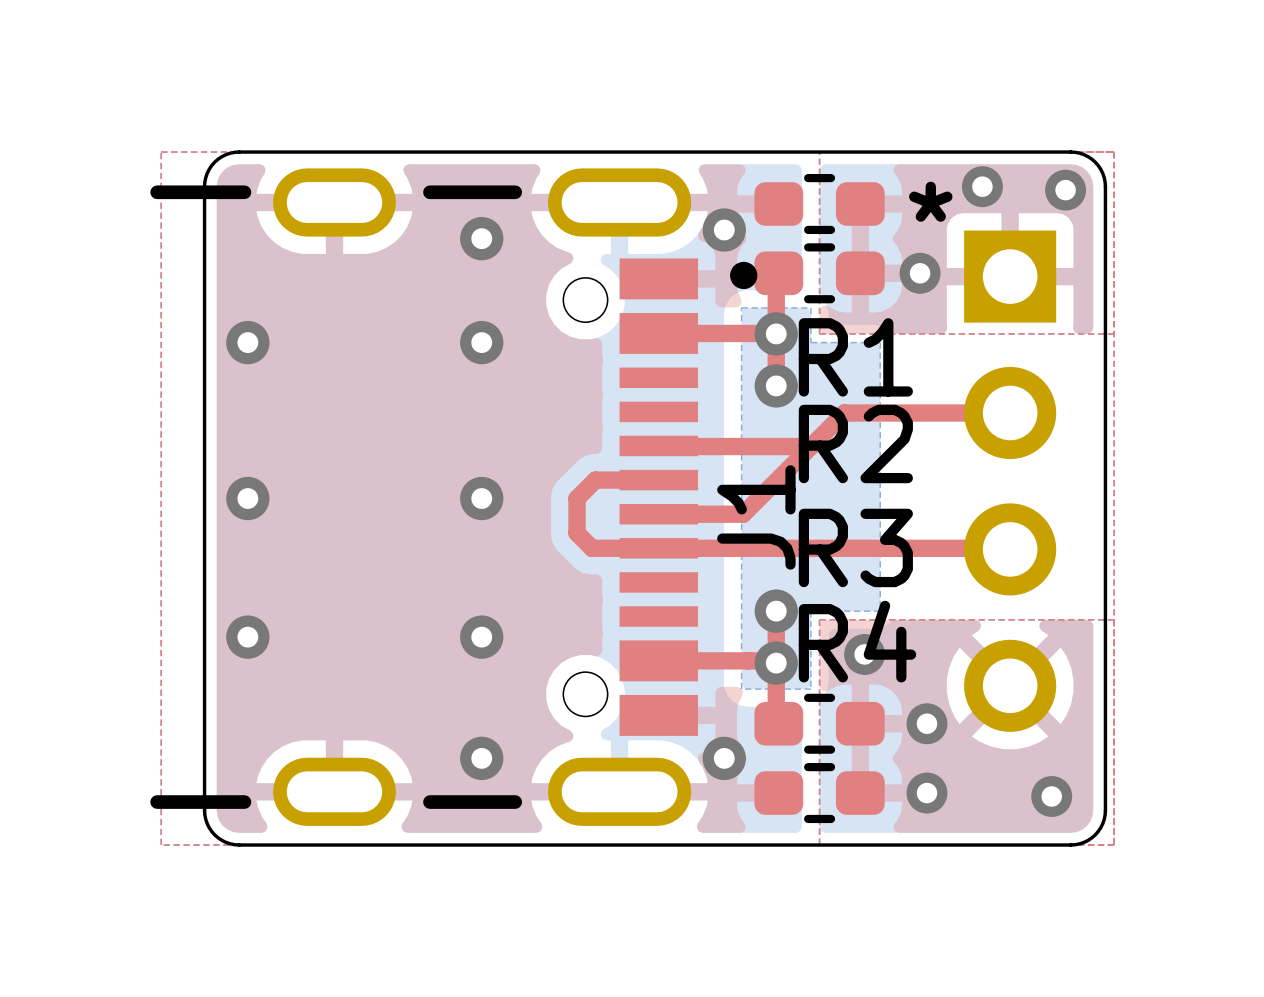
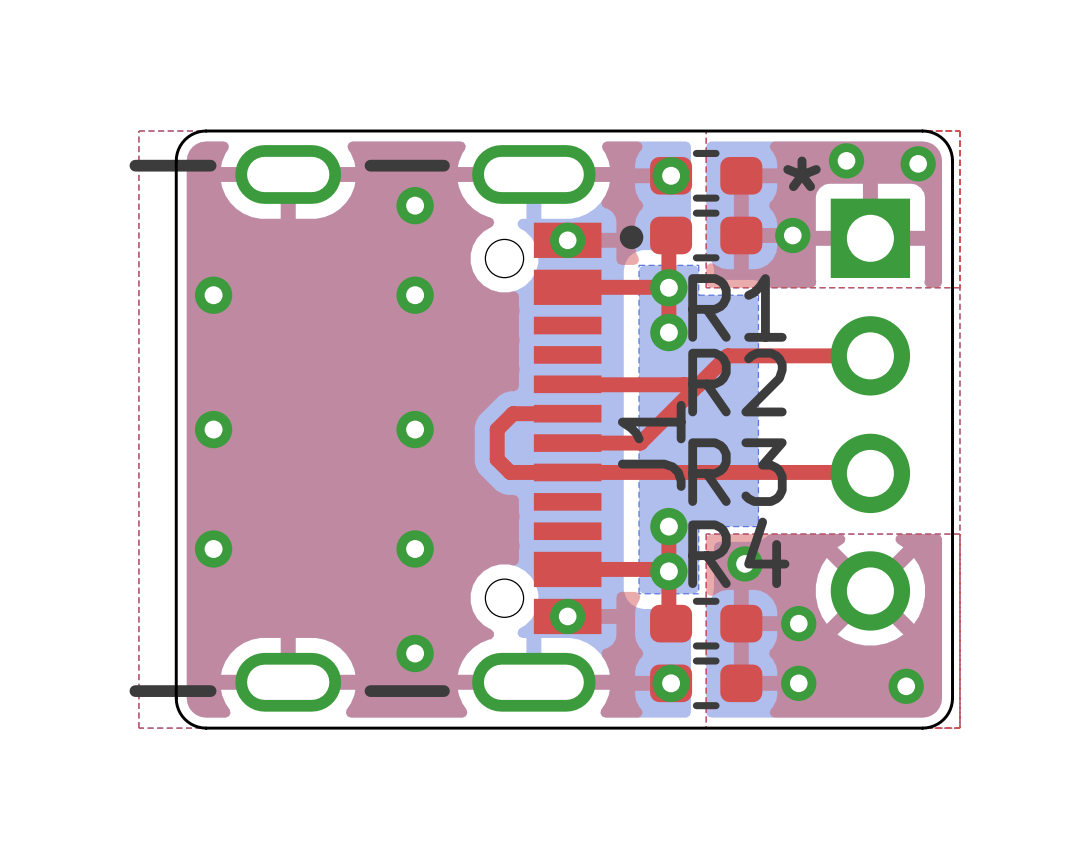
J1 footprint: [150, 168, 758, 826] -> [129, 145, 644, 712]
via position: (724, 229) -> (671, 175)
via: none -> (567, 240)
via: none -> (567, 616)
via position: (724, 758) -> (671, 683)

